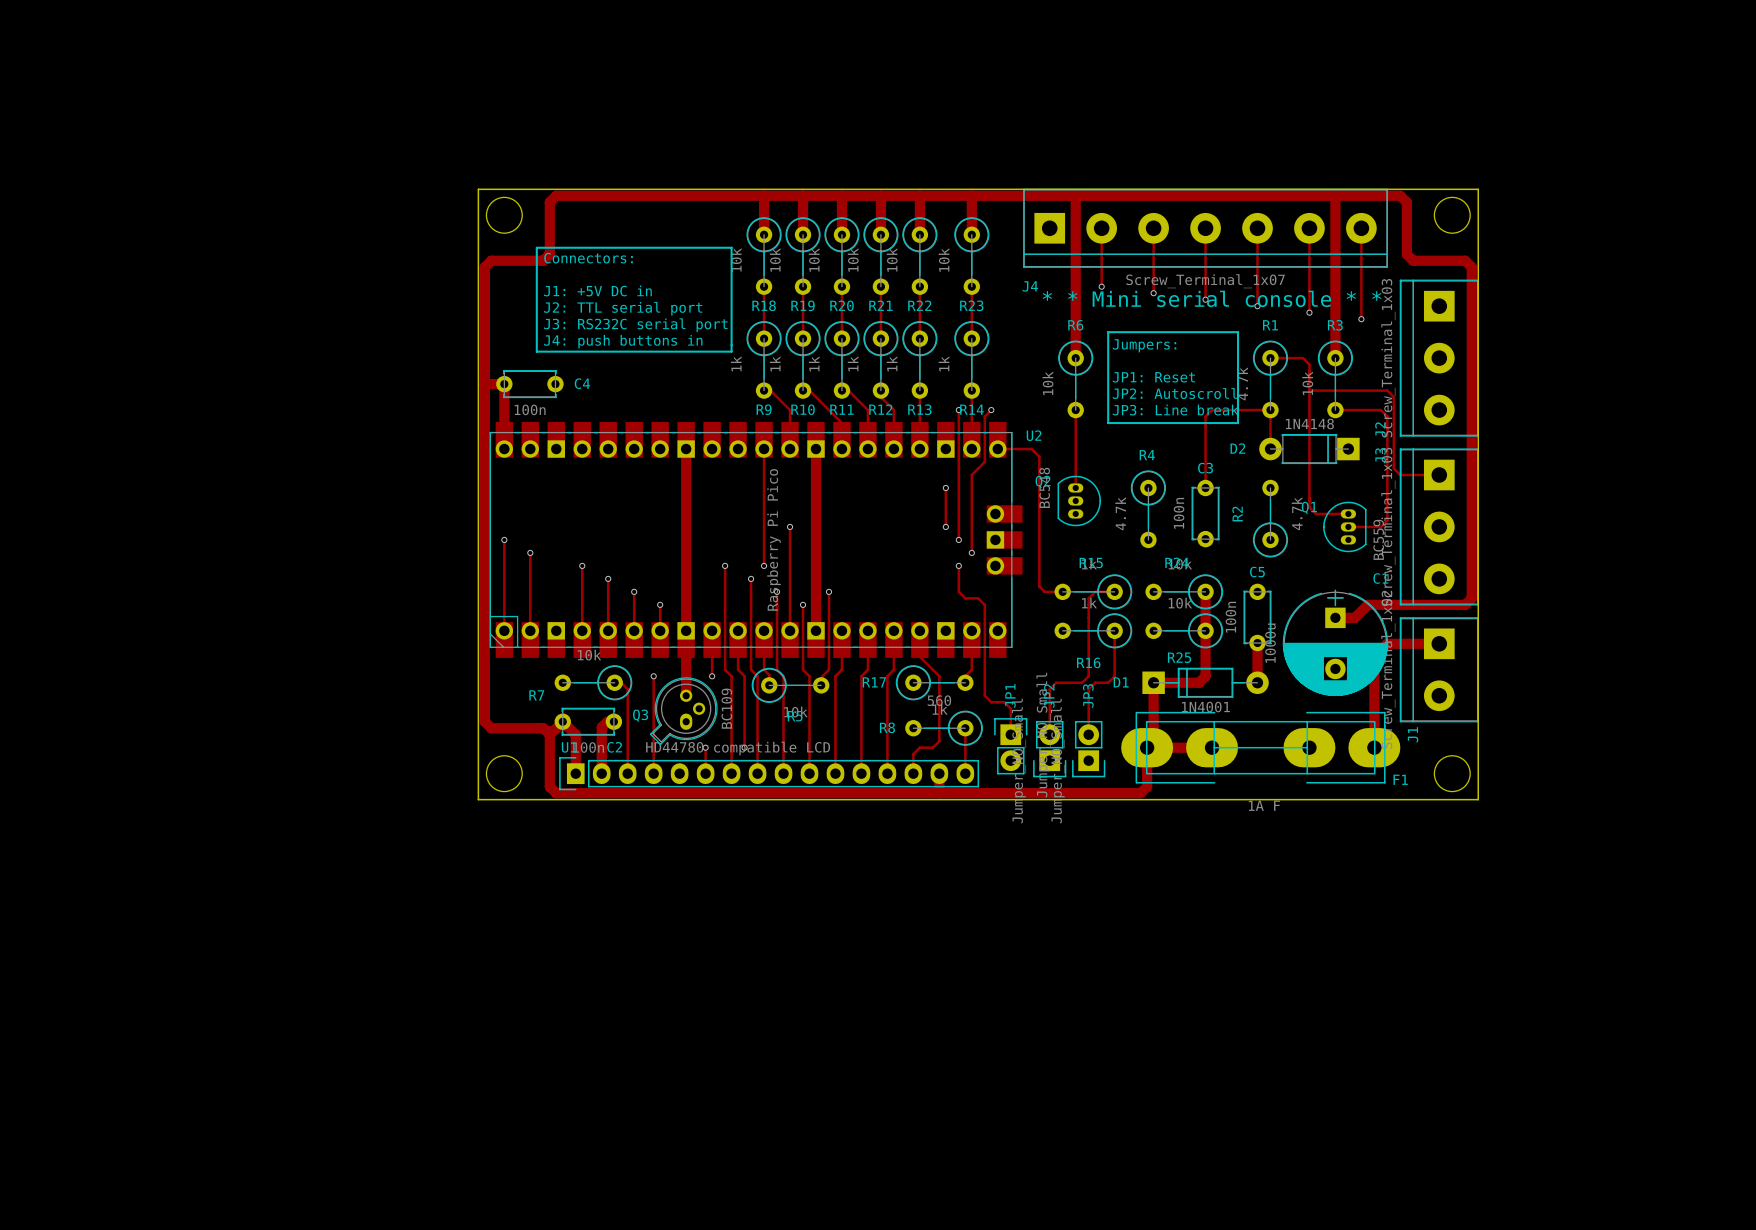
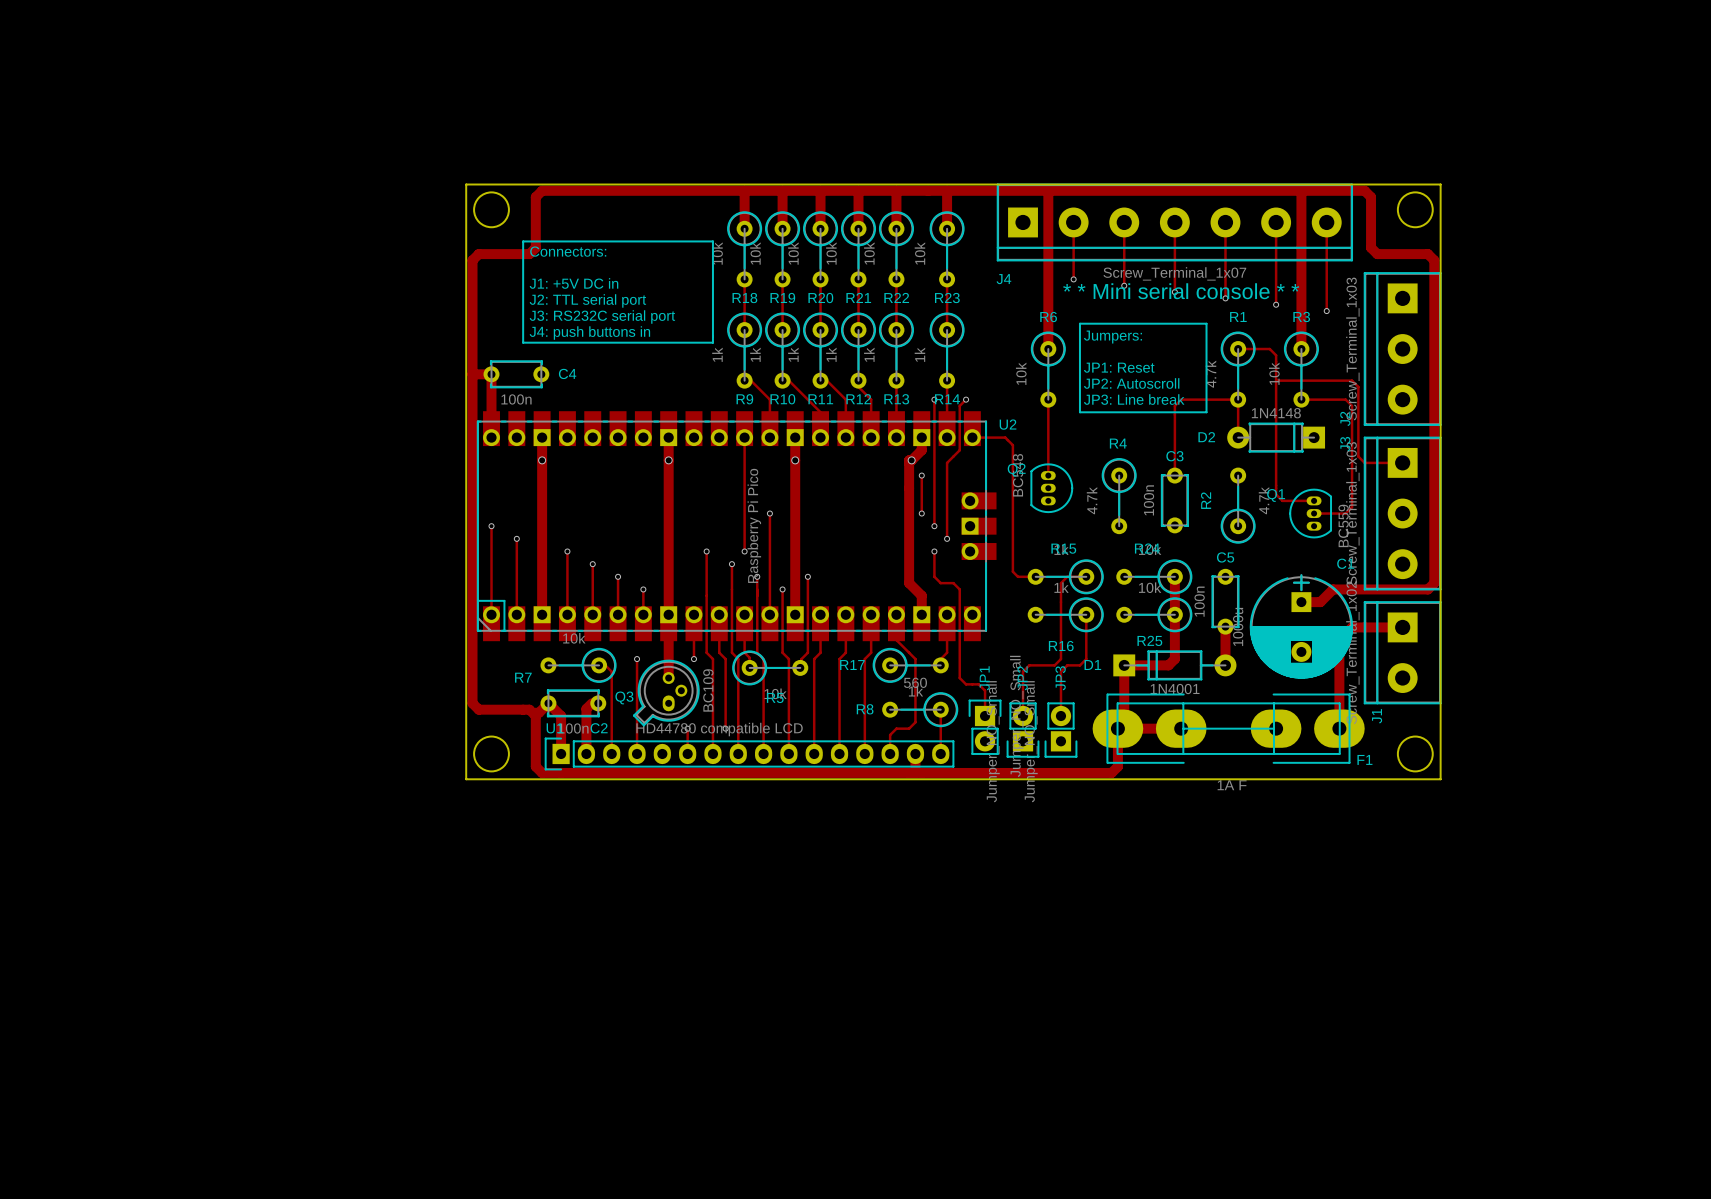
track: none -> (542, 437) (542, 614)
track: none -> (921, 437) (921, 450) (909, 462)
via: none -> (542, 460)
via: none -> (668, 460)
via: none -> (795, 460)
track: none -> (911, 460) (909, 460) (909, 583) (921, 595) (921, 614)
via: none -> (911, 460)

